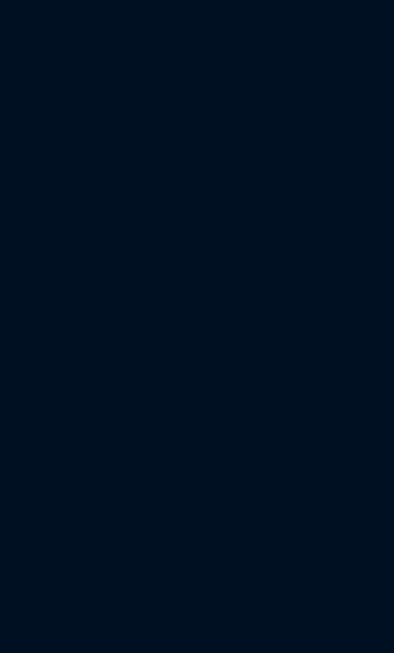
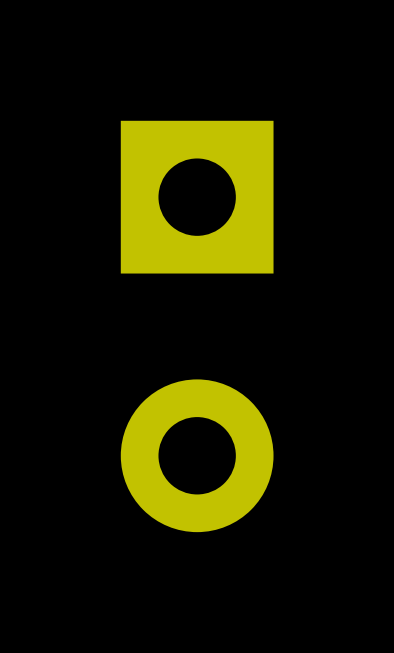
part: none -> (197, 326)

